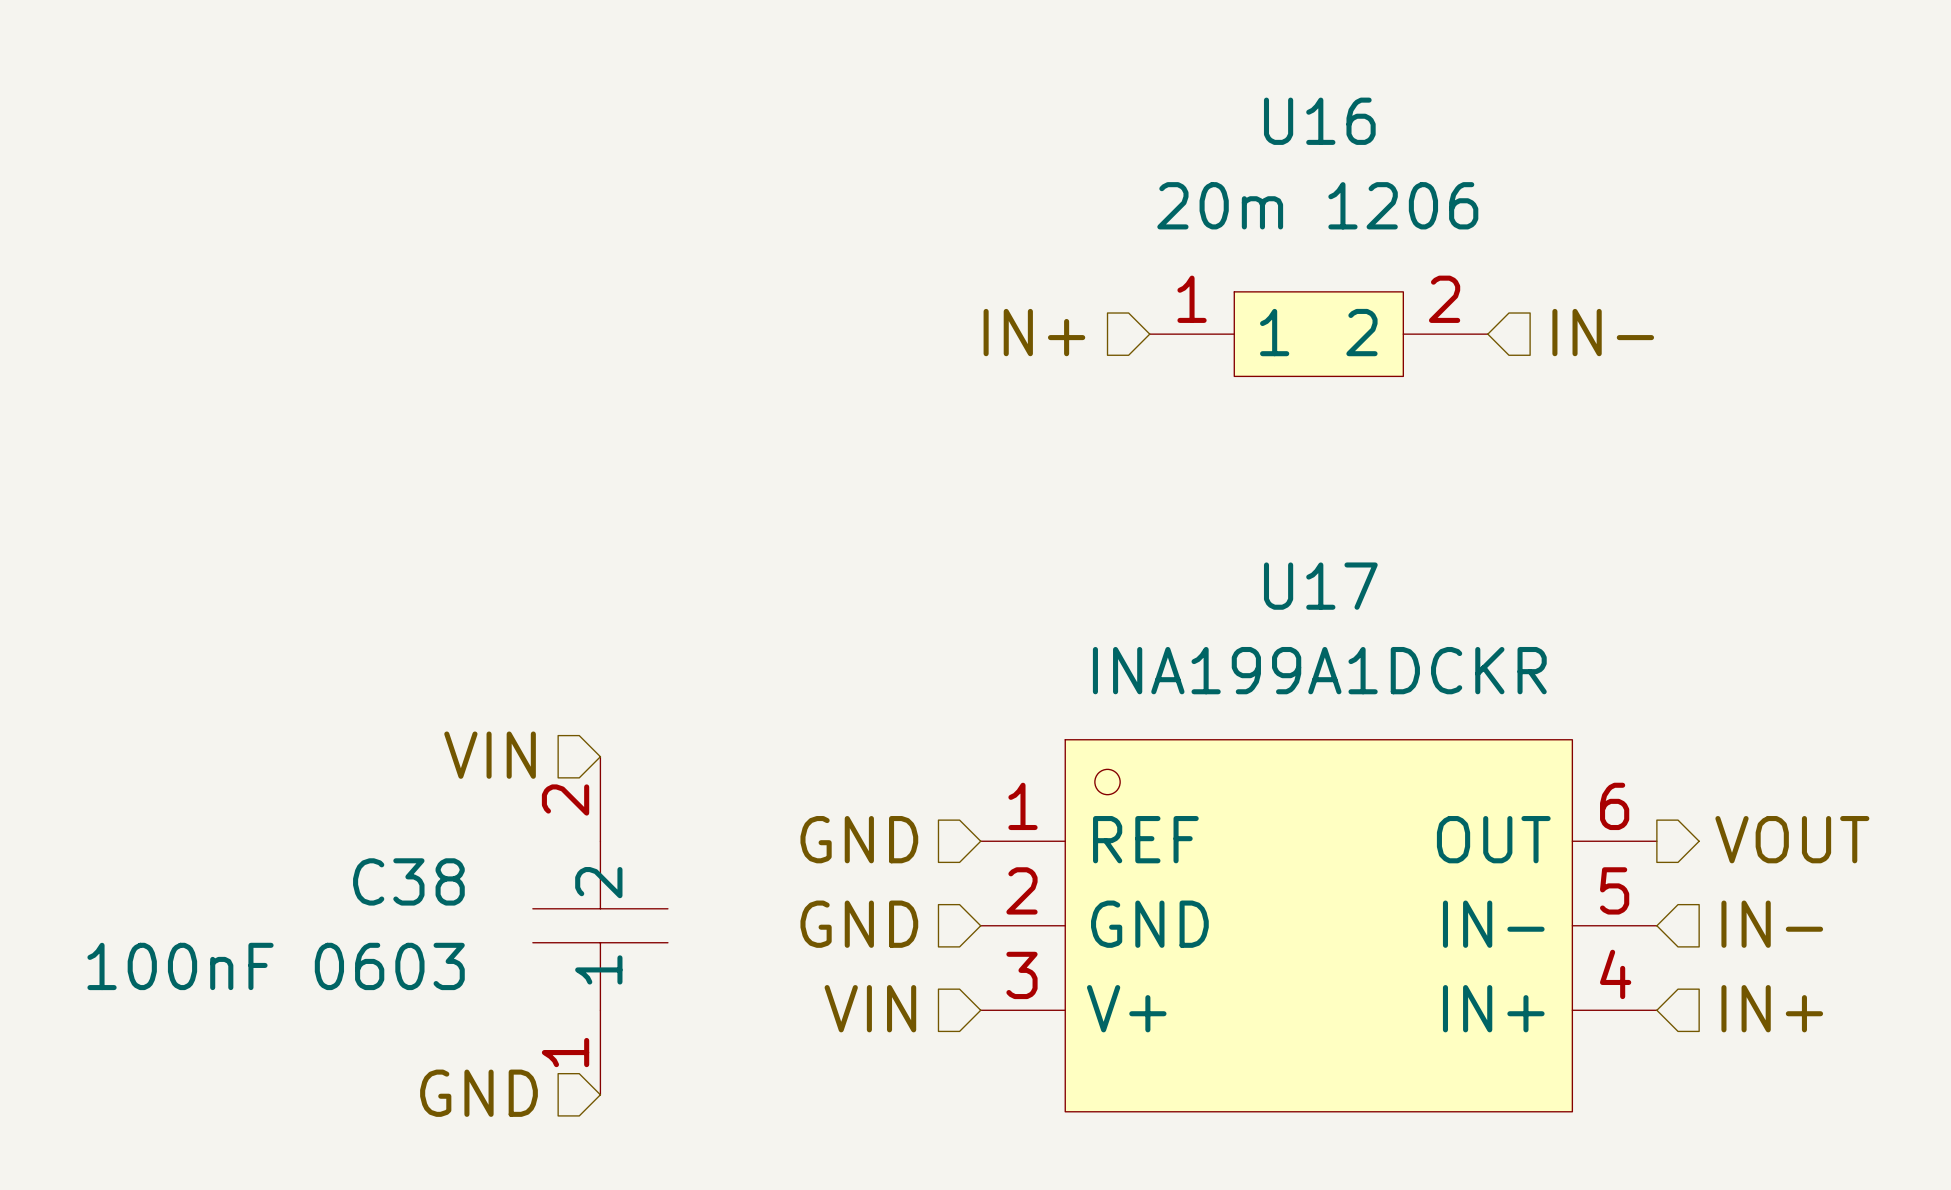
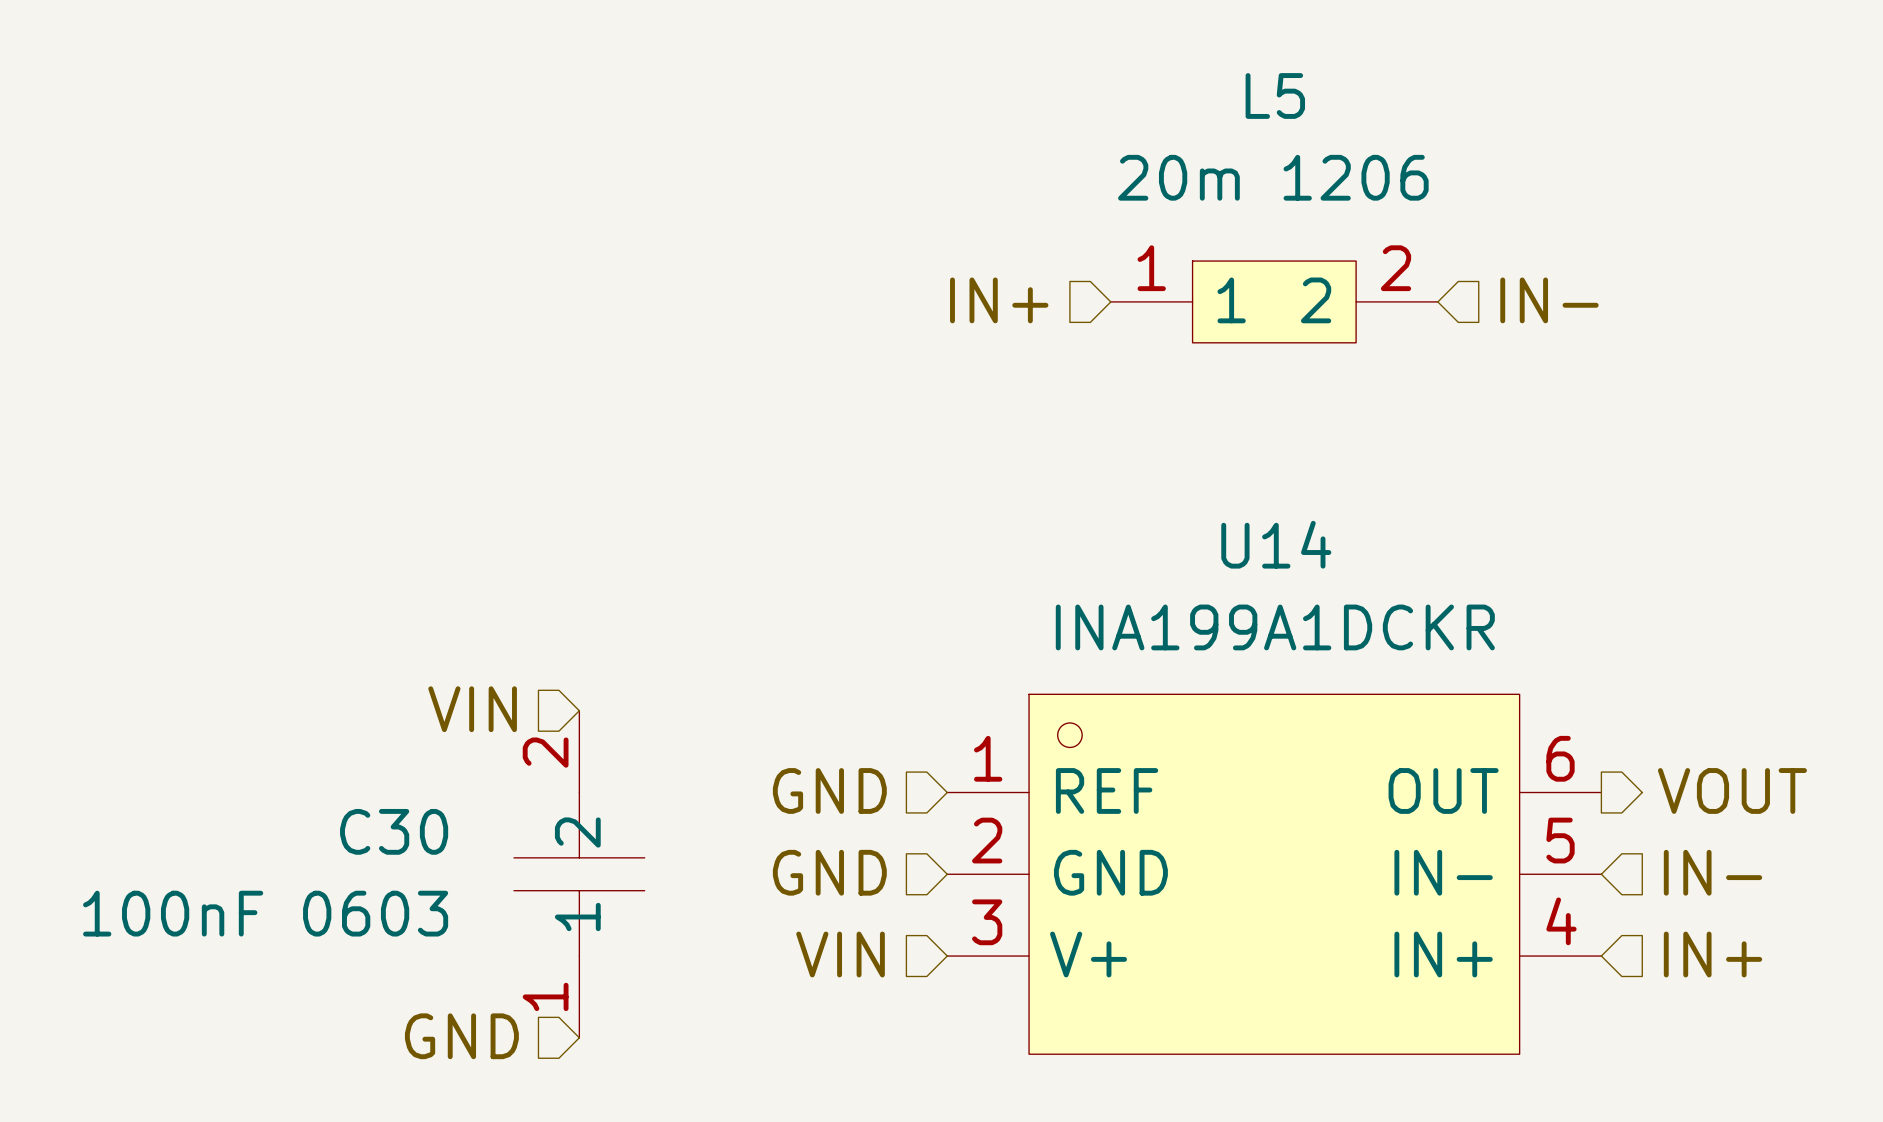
U16 name: U16 (1319, 121) -> L5 (1275, 95)
U17 name: U17 (1320, 586) -> U14 (1276, 544)
C38 name: C38 (408, 881) -> C30 (394, 831)

